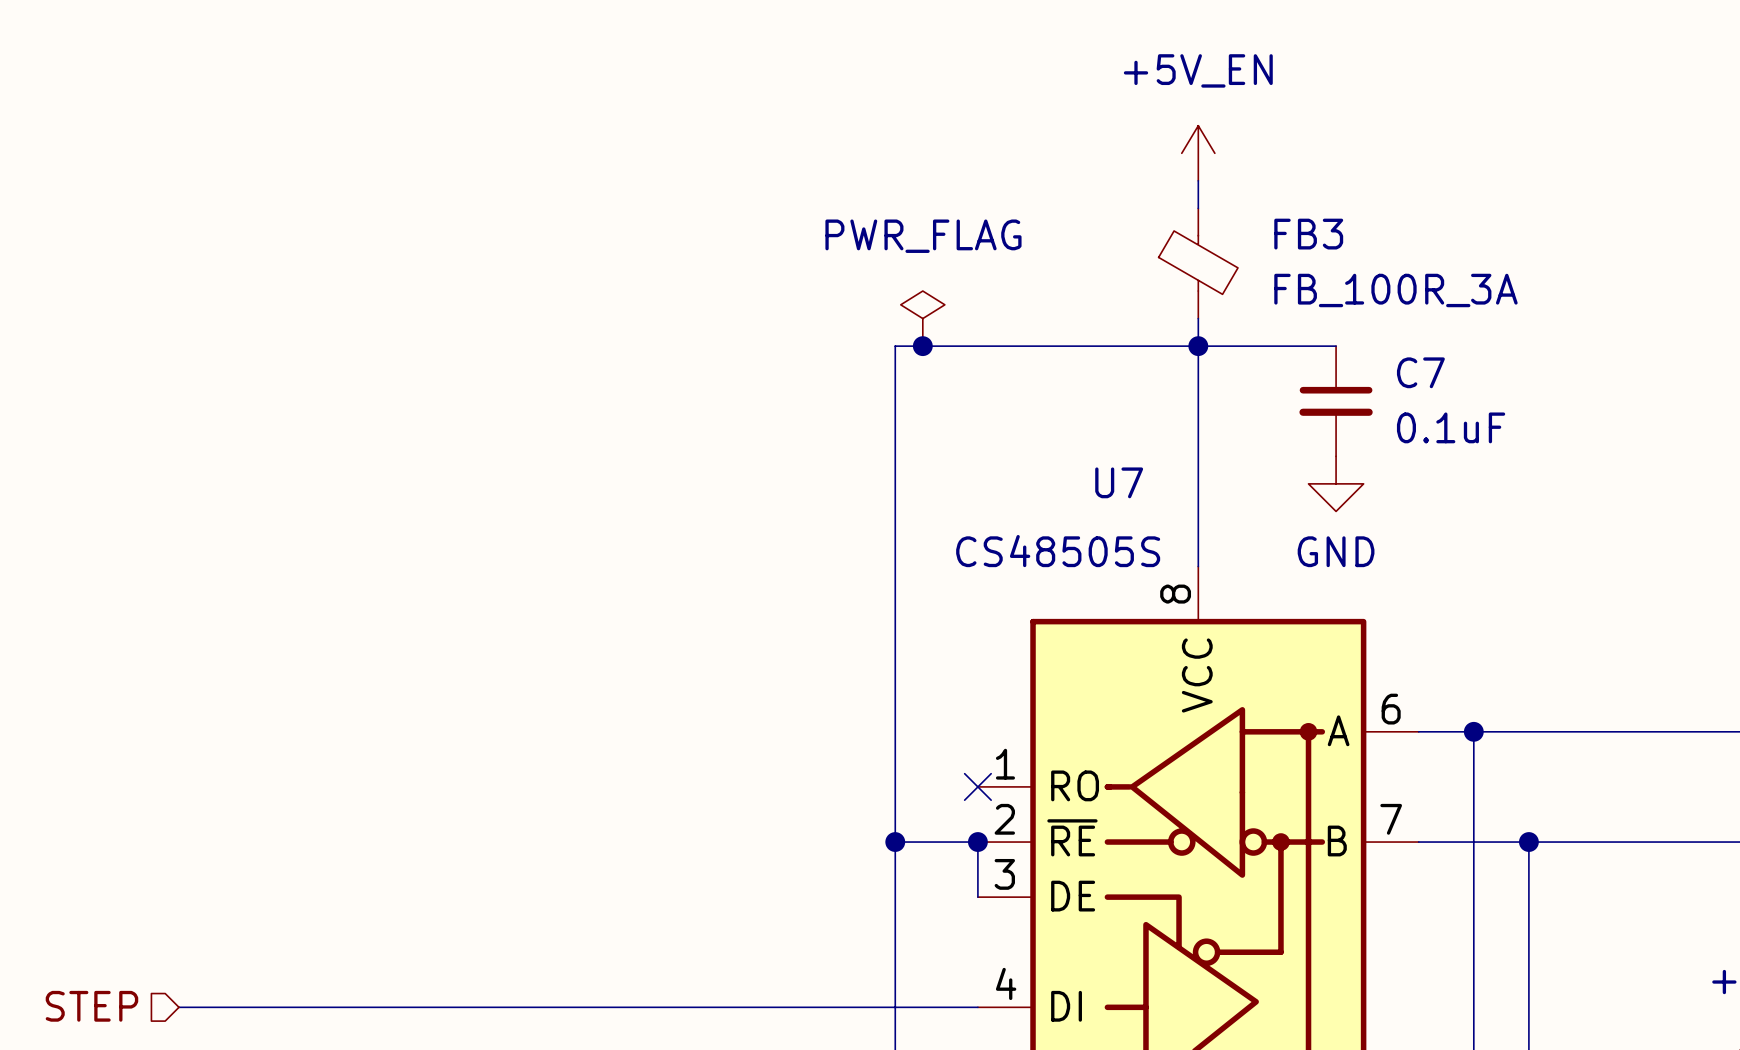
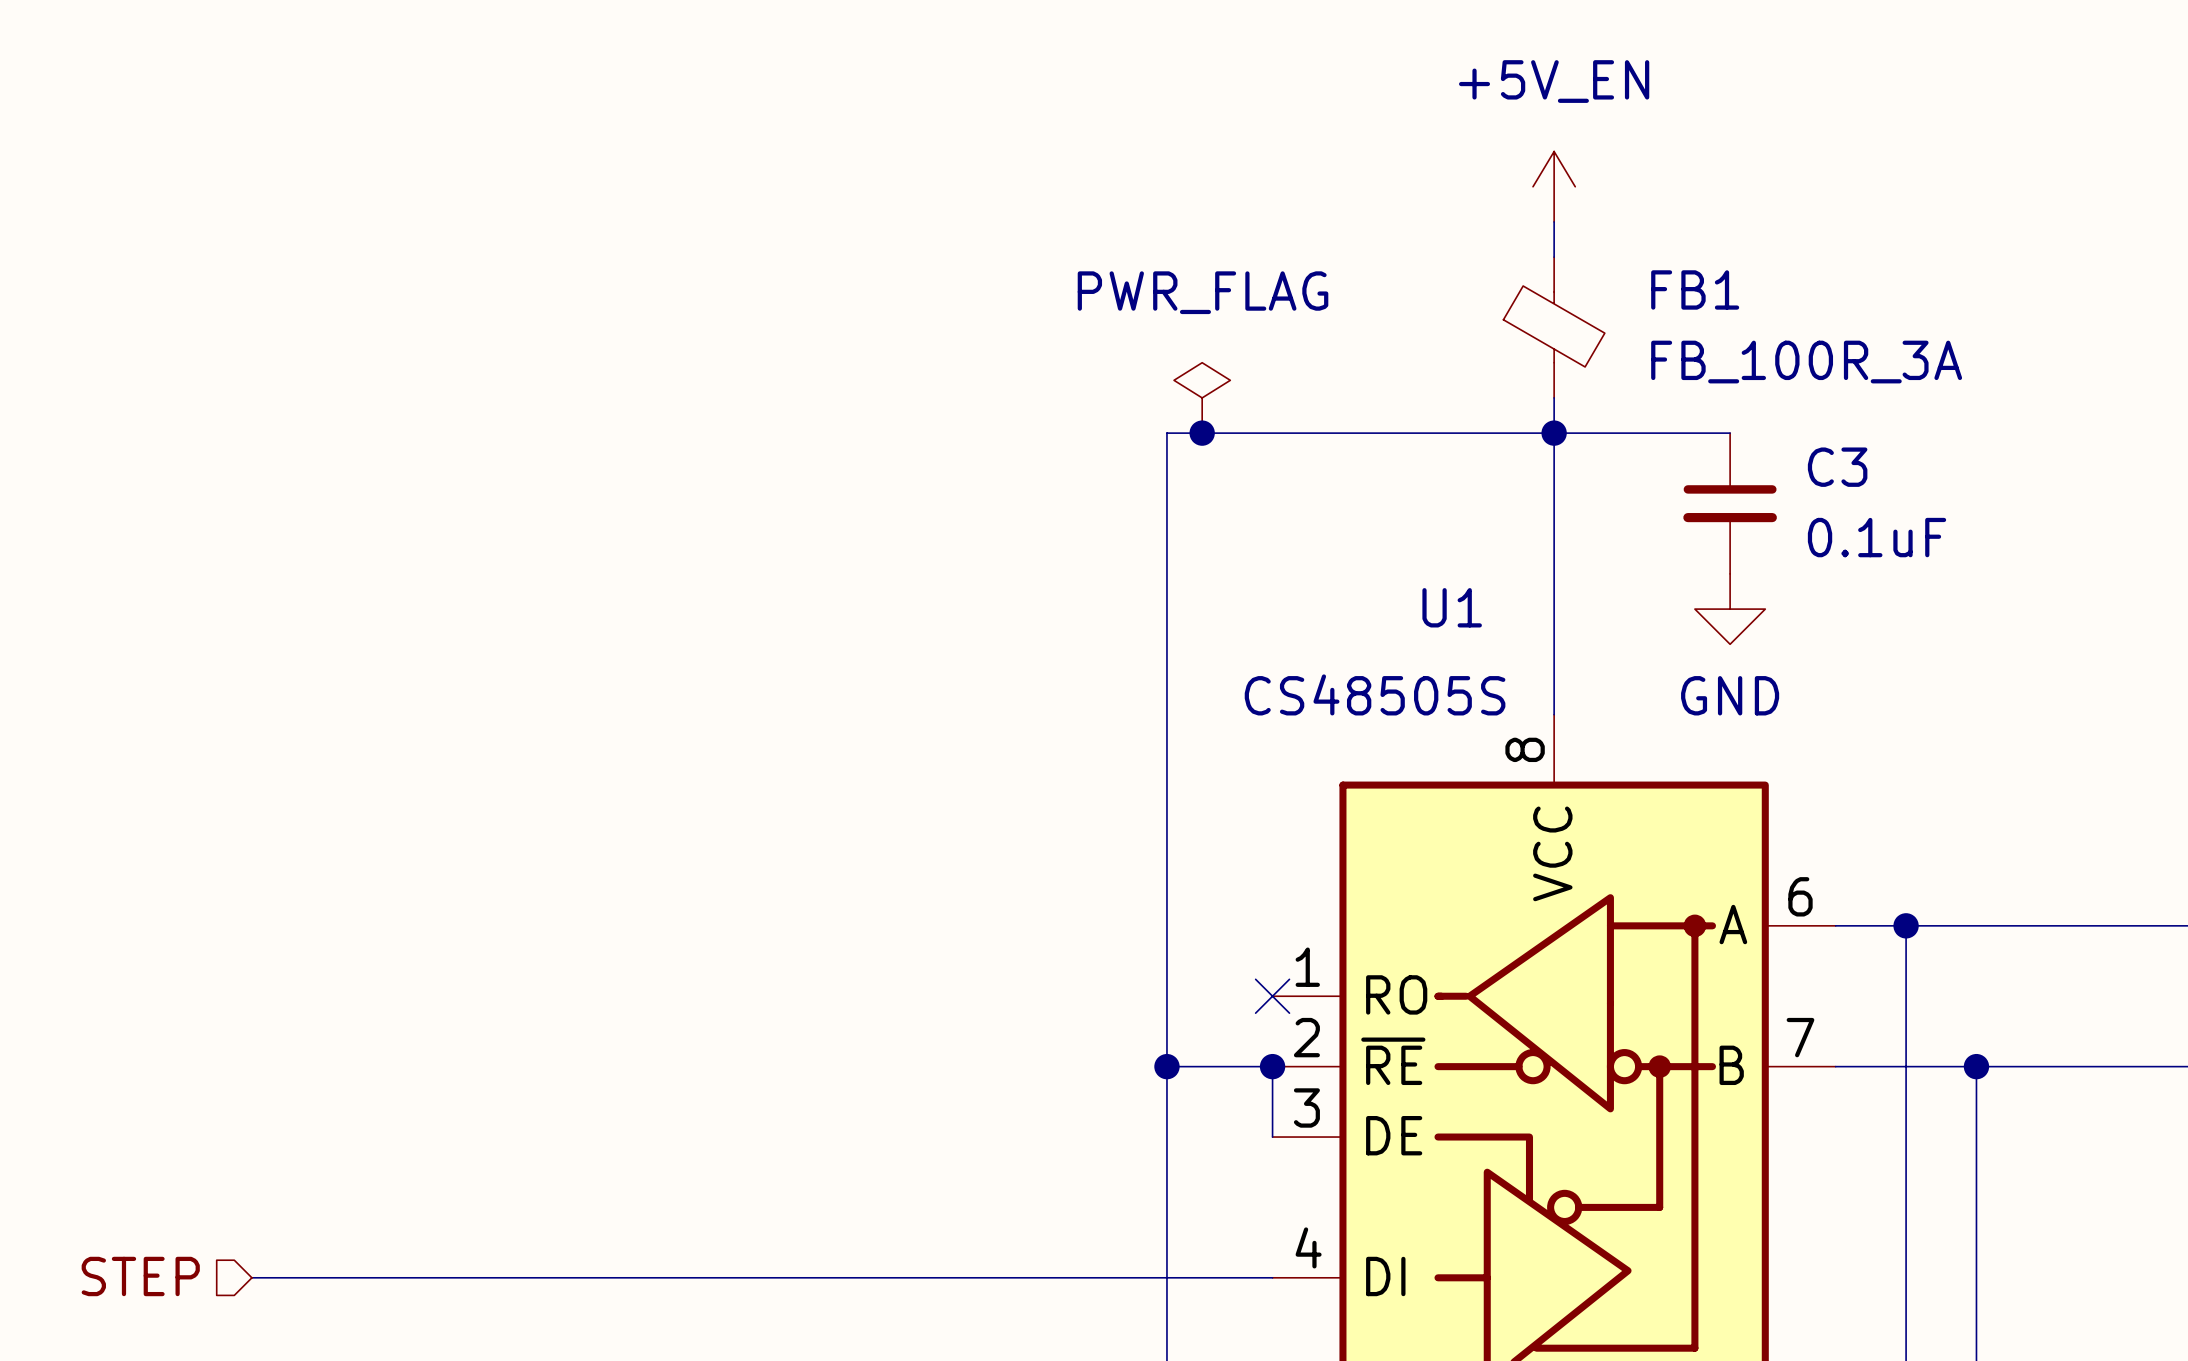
FB3 name: FB3 (1308, 234) -> FB1 (1695, 289)
C7 name: C7 (1420, 372) -> C3 (1837, 467)
U7 name: U7 (1119, 482) -> U1 (1452, 607)

